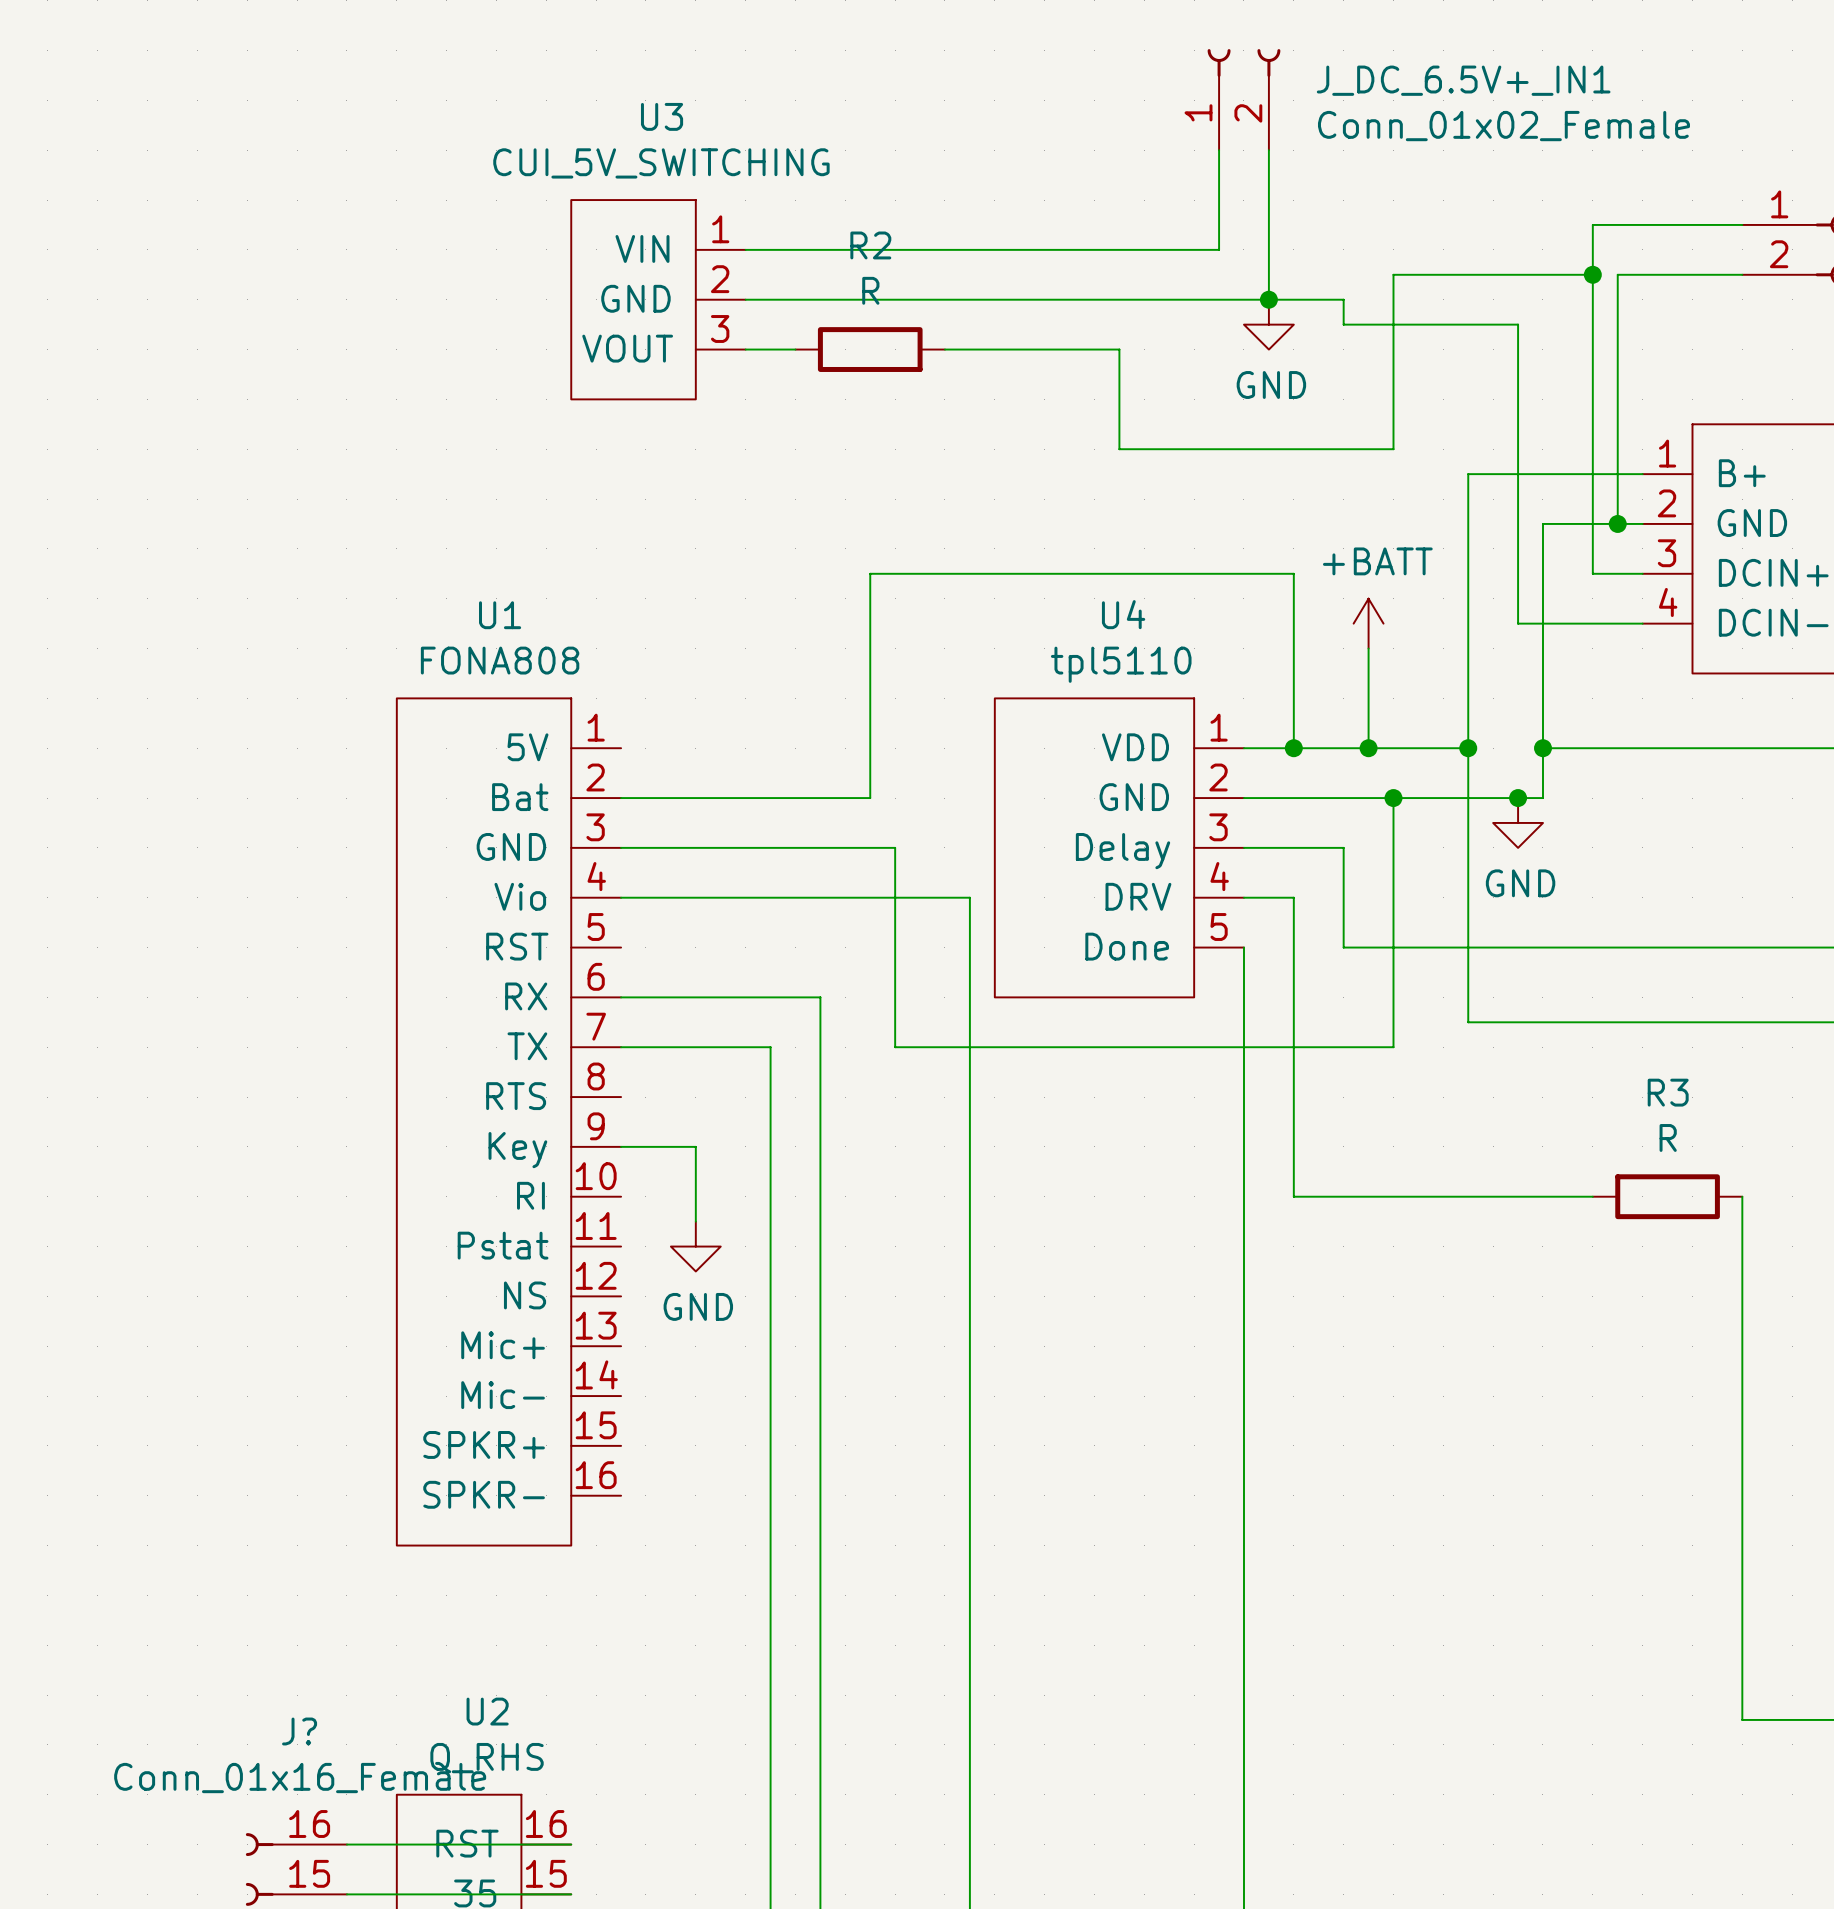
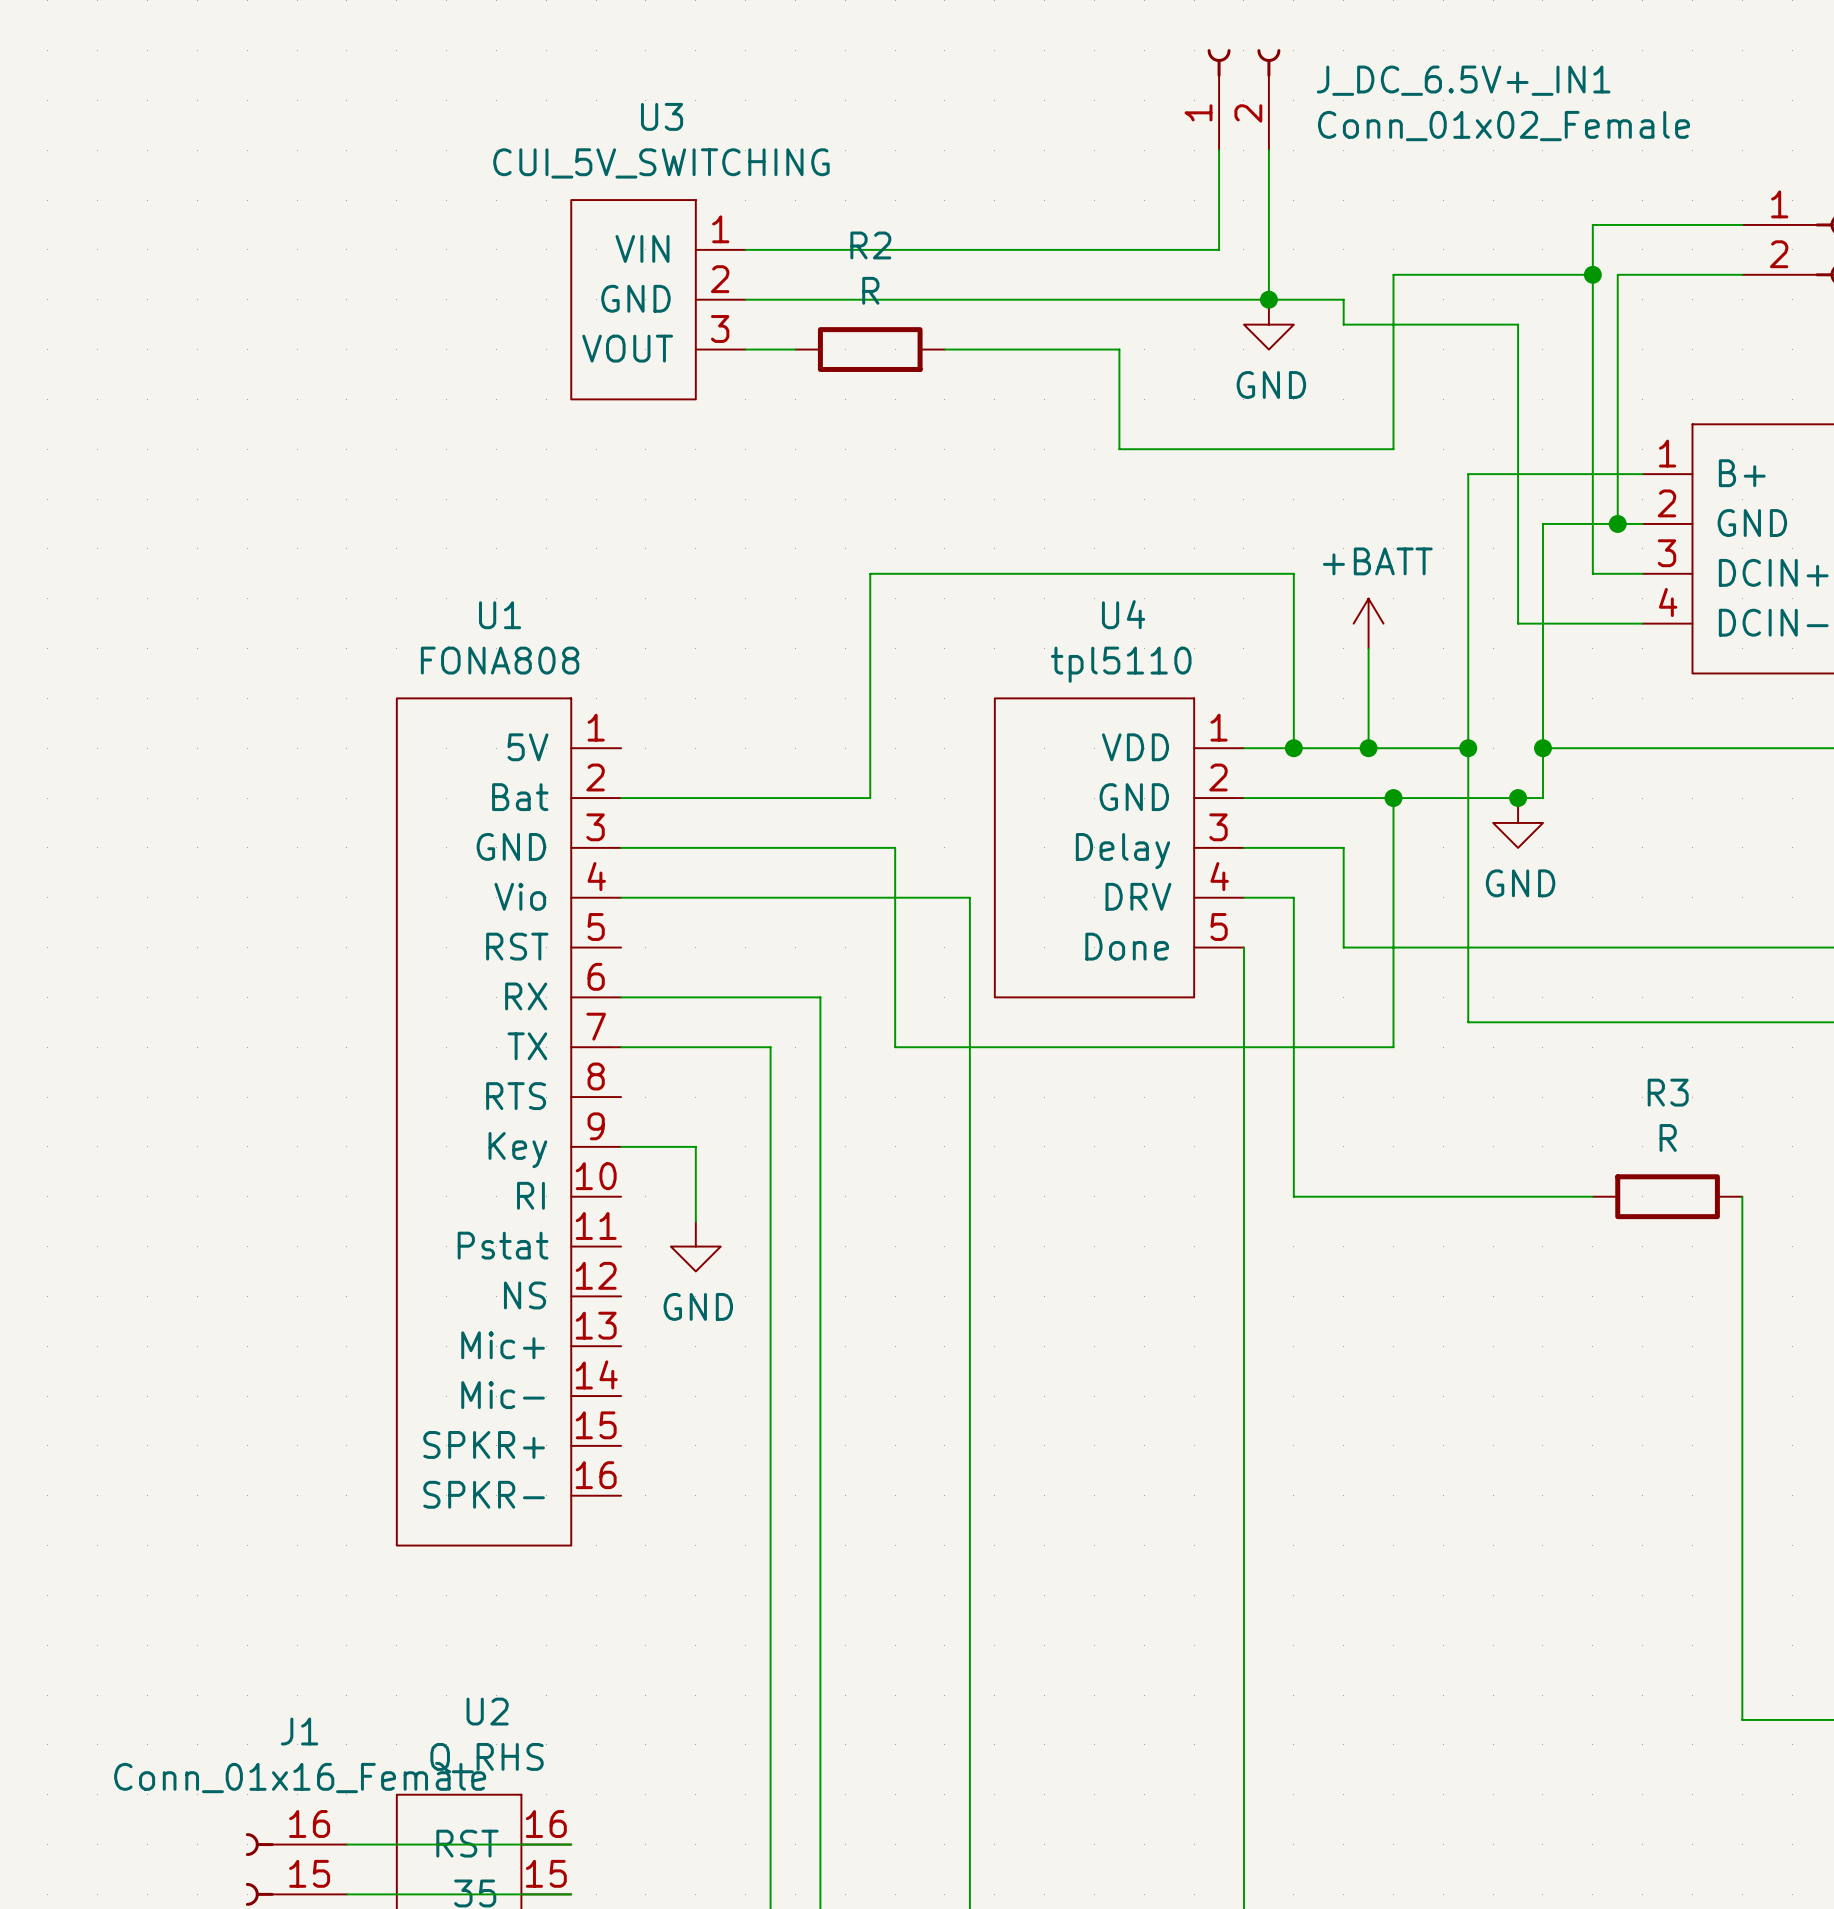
J? name: J? (299, 1731) -> J1 (299, 1731)

